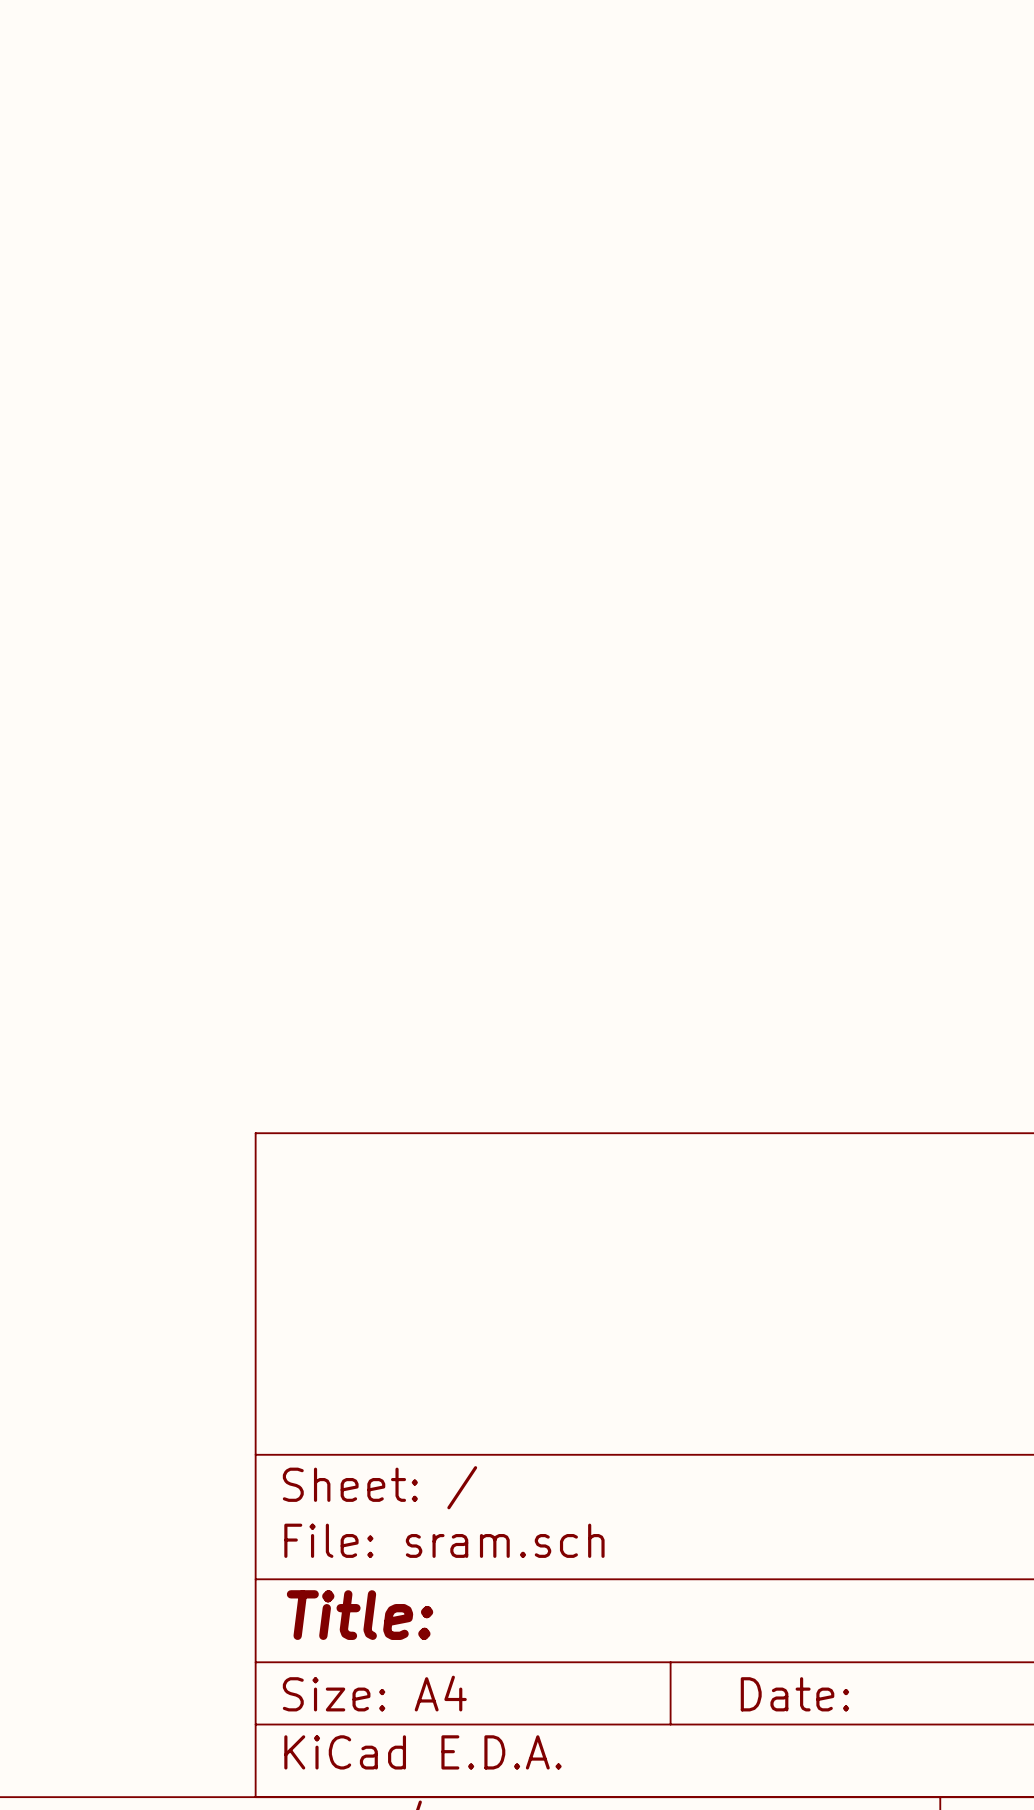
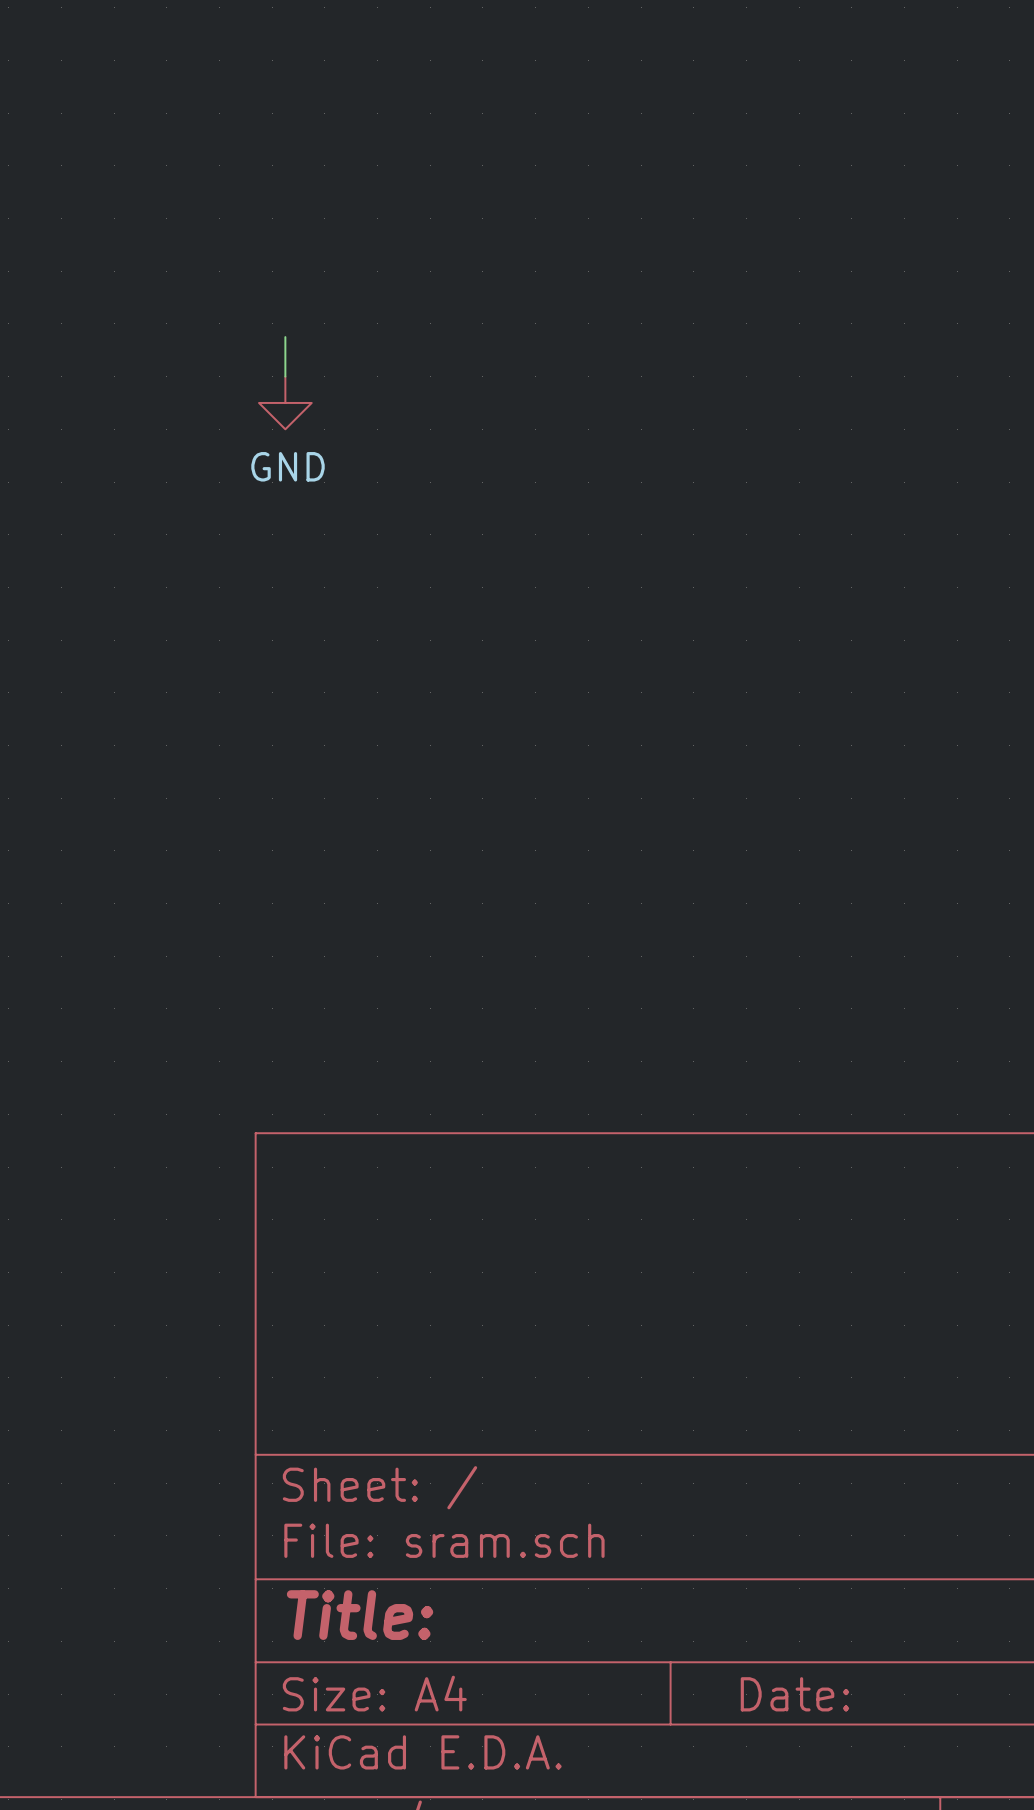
wire: none -> (285, 337) (285, 376)
power symbol: none -> GND (285, 402)

